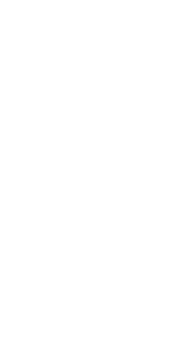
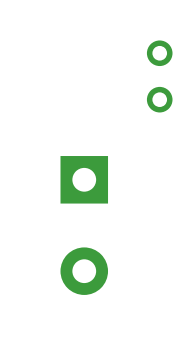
part: none -> (159, 76)
part: none -> (84, 225)

